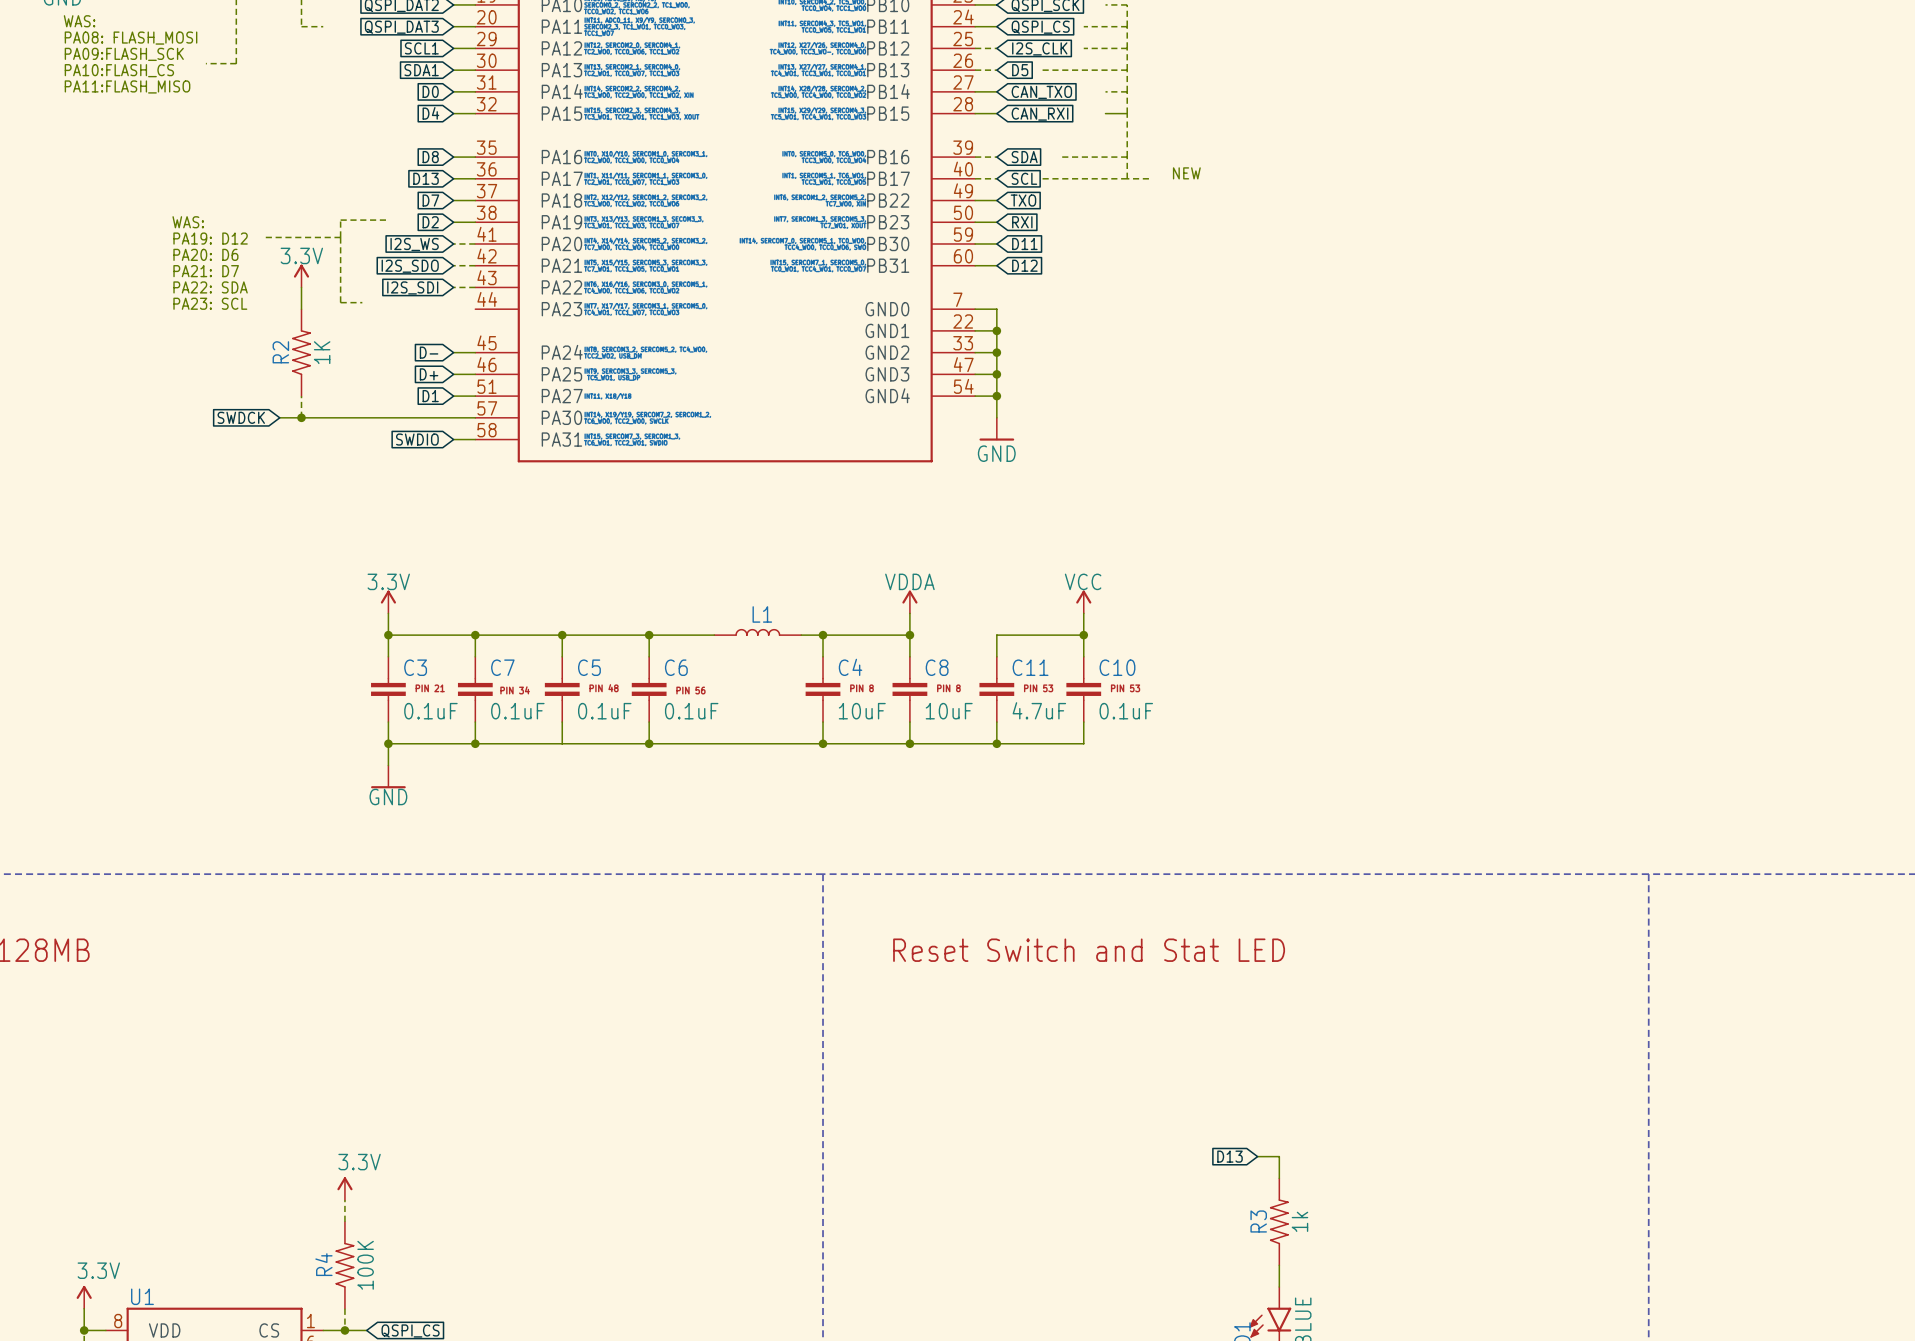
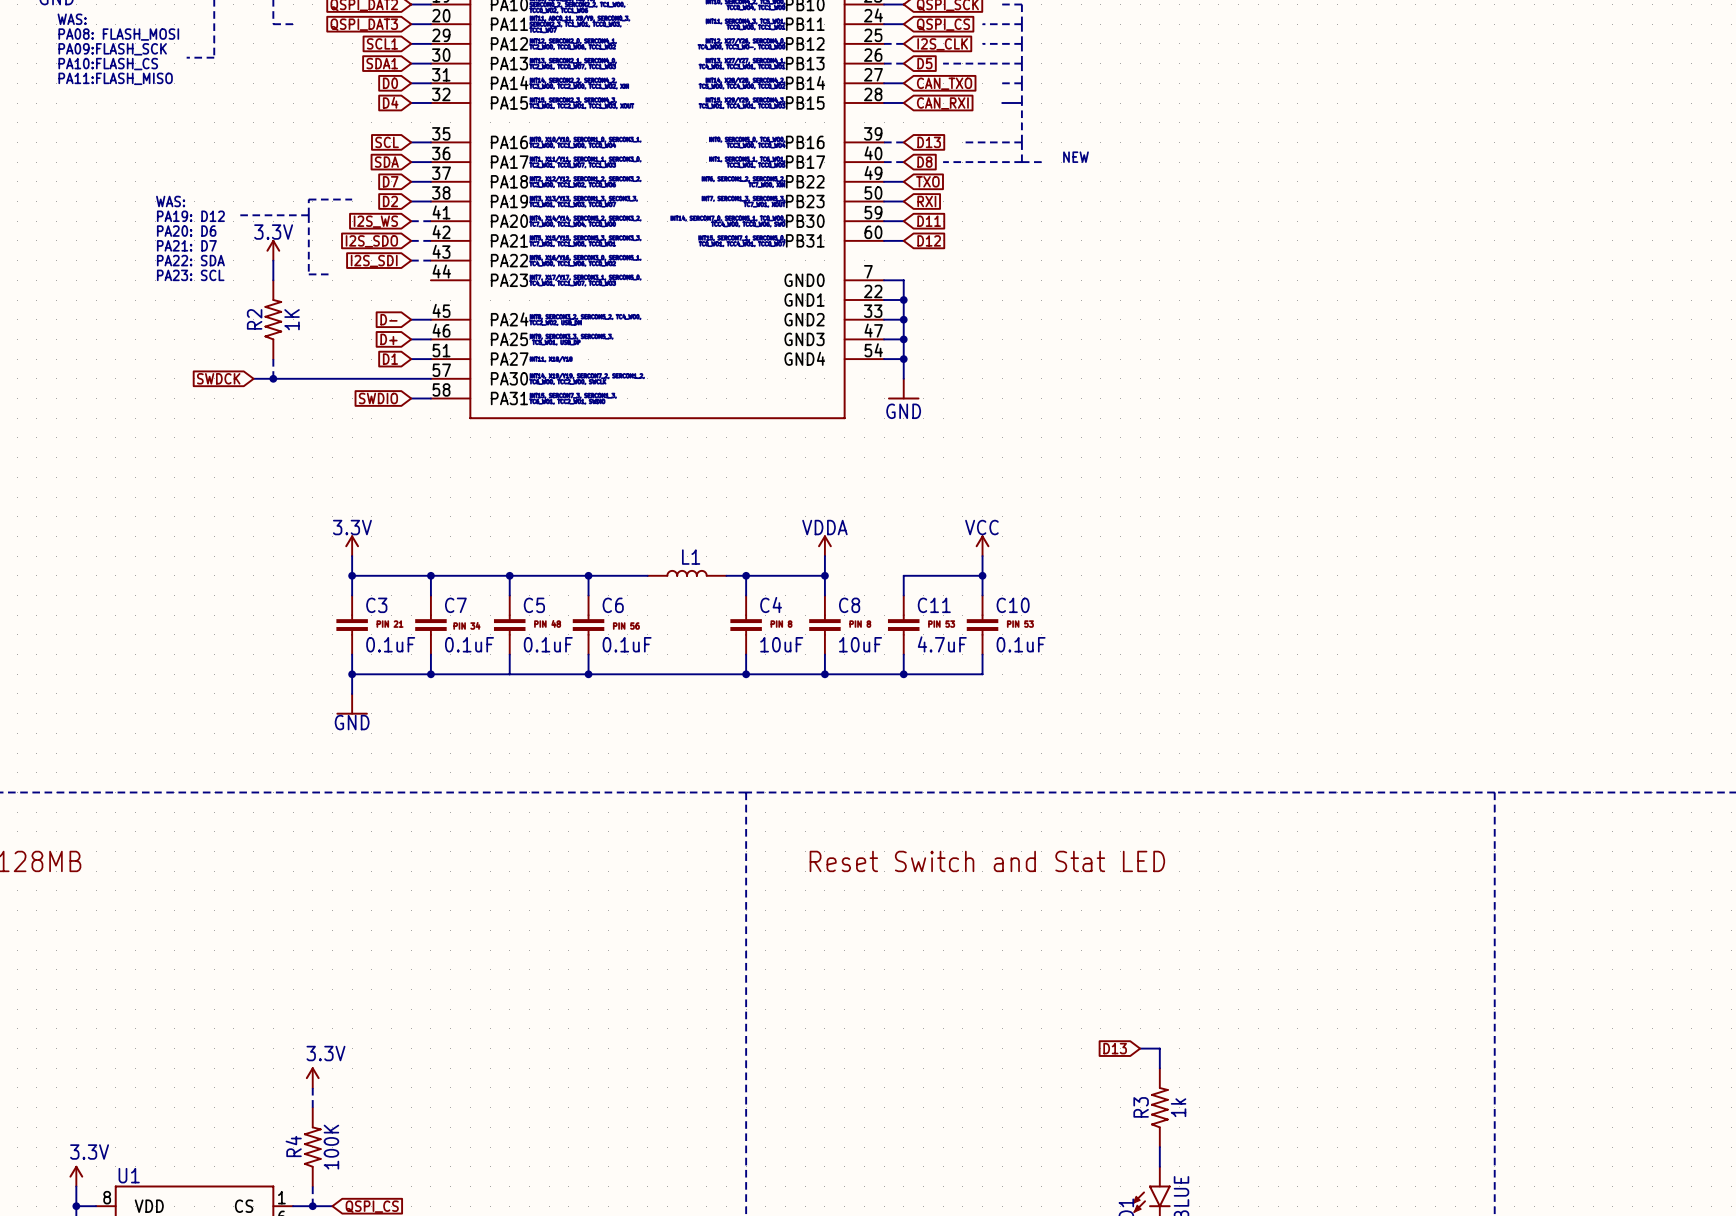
global label: D8 (430, 157) -> SCL (387, 142)
global label: SDA (1024, 157) -> D13 (929, 142)
global label: D13 (426, 178) -> SDA (386, 162)
global label: SCL (1024, 178) -> D8 (924, 162)

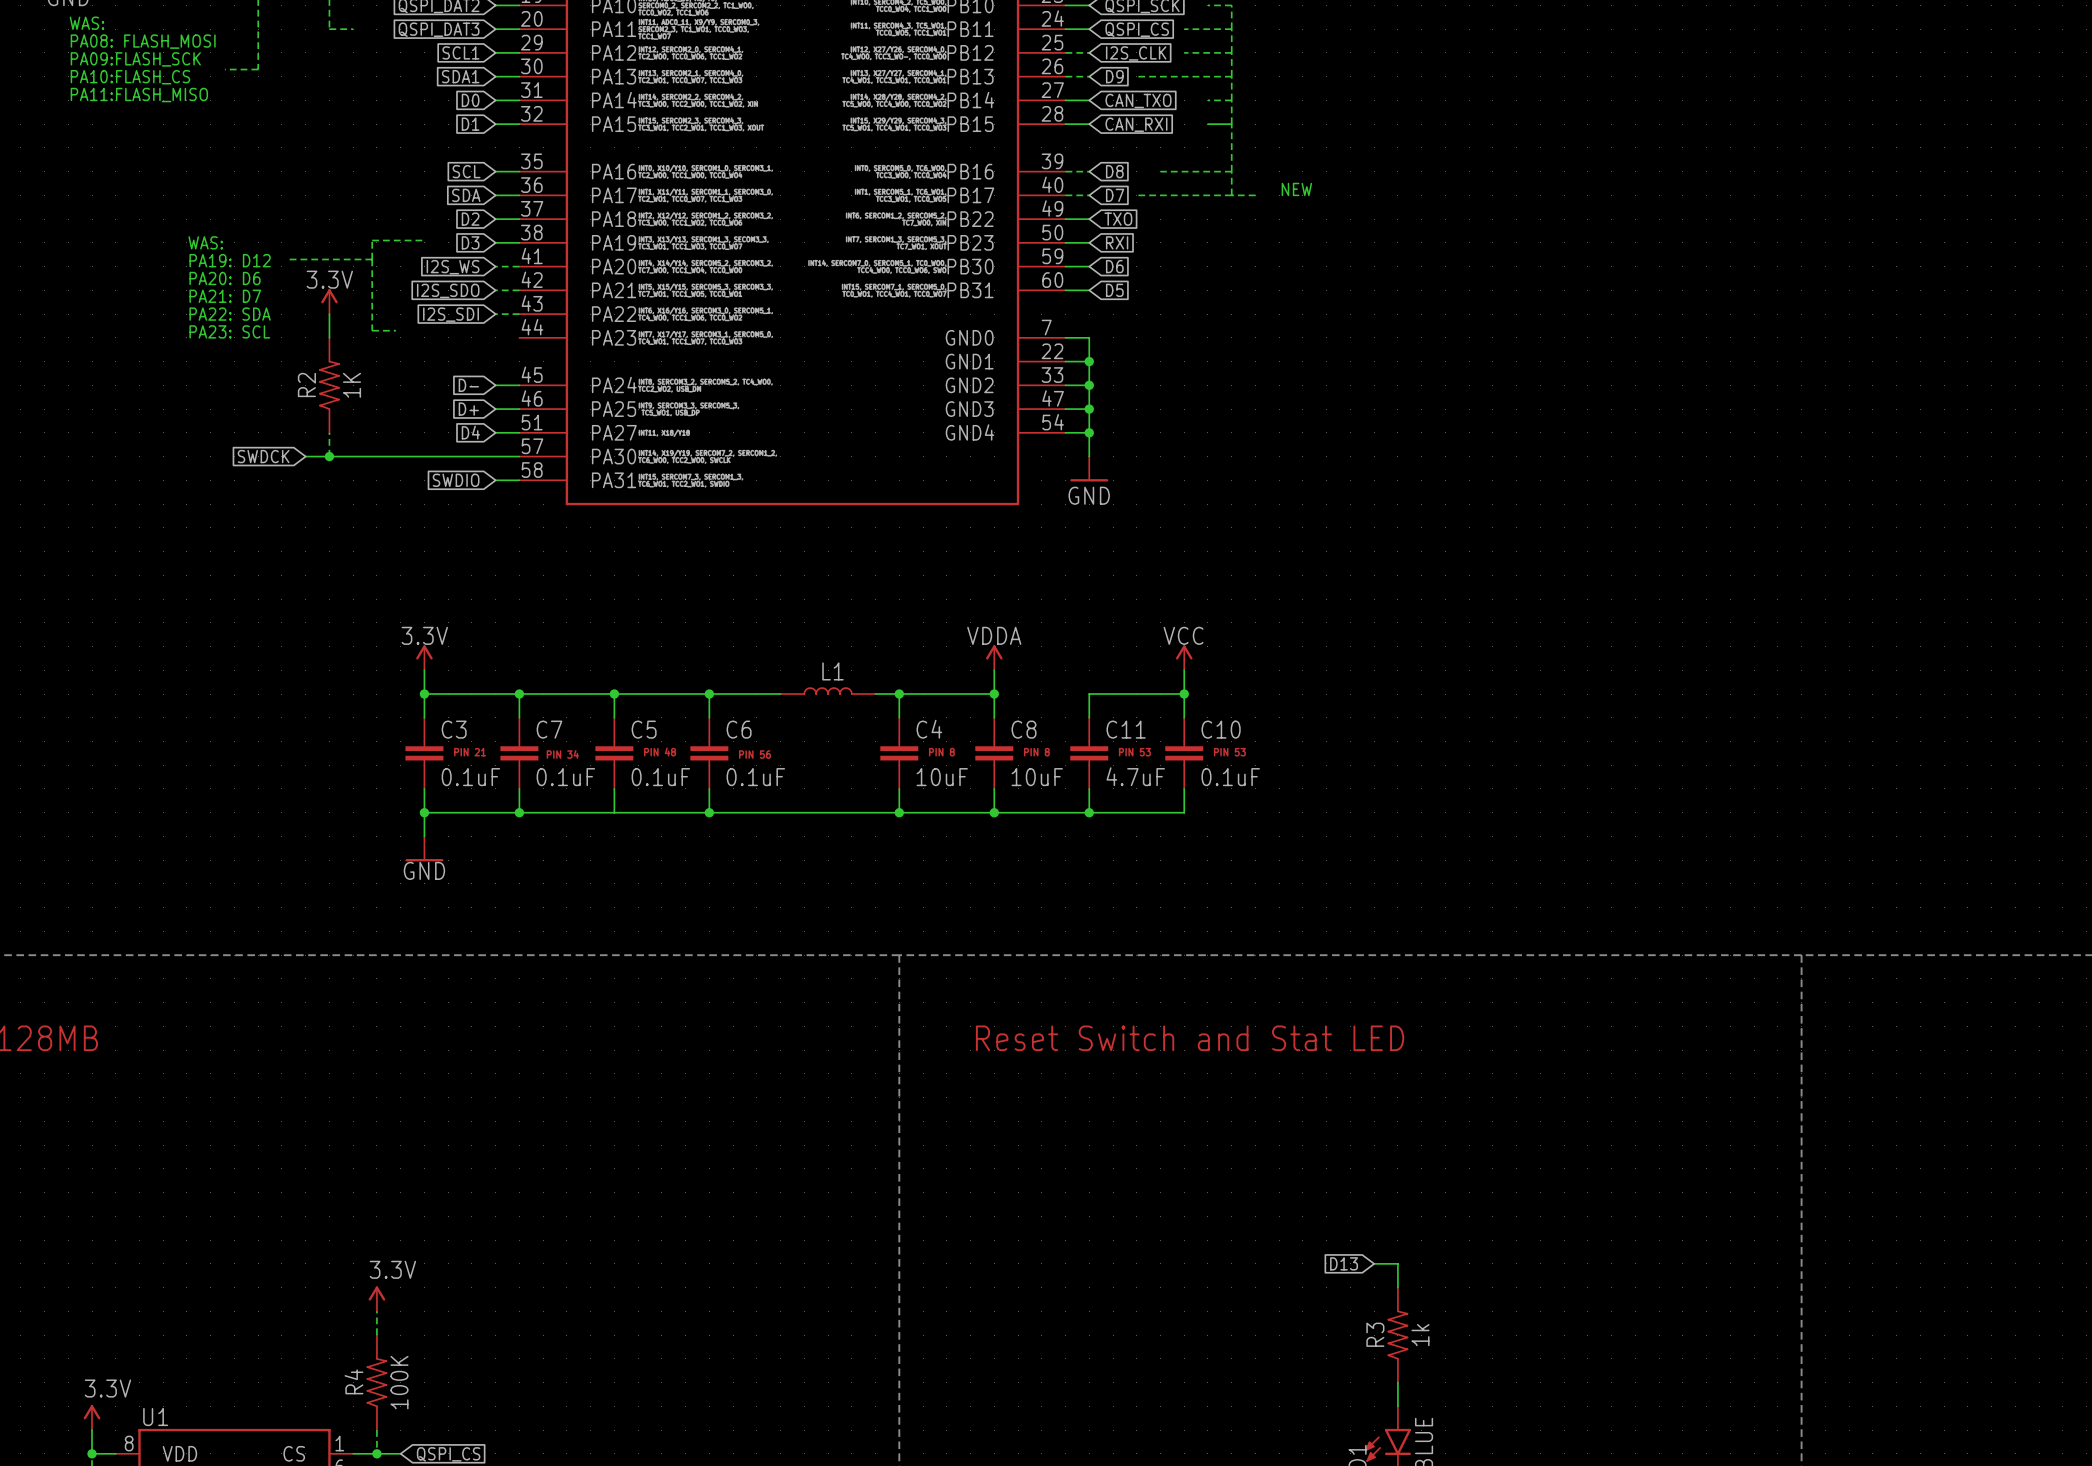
global label: D5 (924, 63) -> D9 (1114, 76)
global label: D4 (390, 102) -> D1 (470, 124)
global label: D13 (929, 142) -> D8 (1114, 171)
global label: D8 (924, 162) -> D7 (1115, 195)
global label: D7 (390, 181) -> D2 (470, 219)
global label: D2 (390, 201) -> D3 (470, 242)
global label: D11 (929, 221) -> D6 (1114, 266)
global label: D12 (929, 240) -> D5 (1114, 290)
global label: D1 (390, 359) -> D4 (470, 432)

